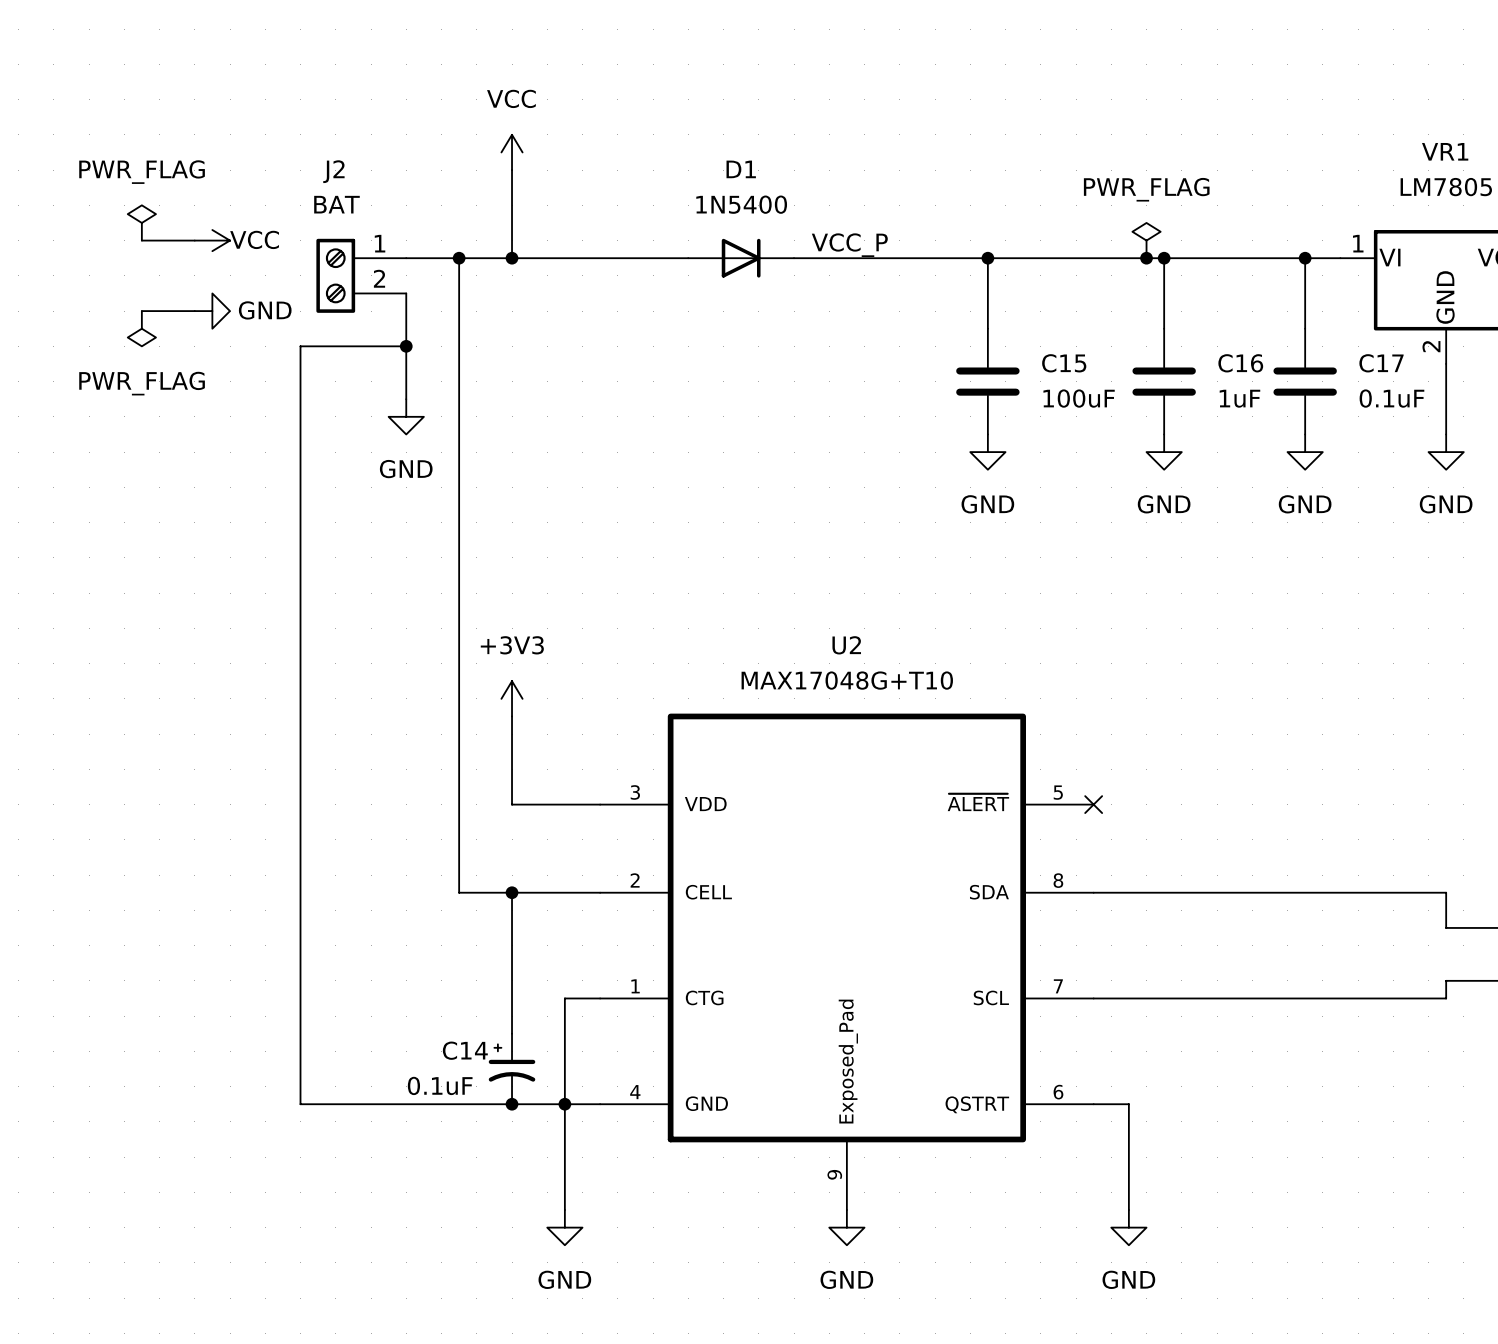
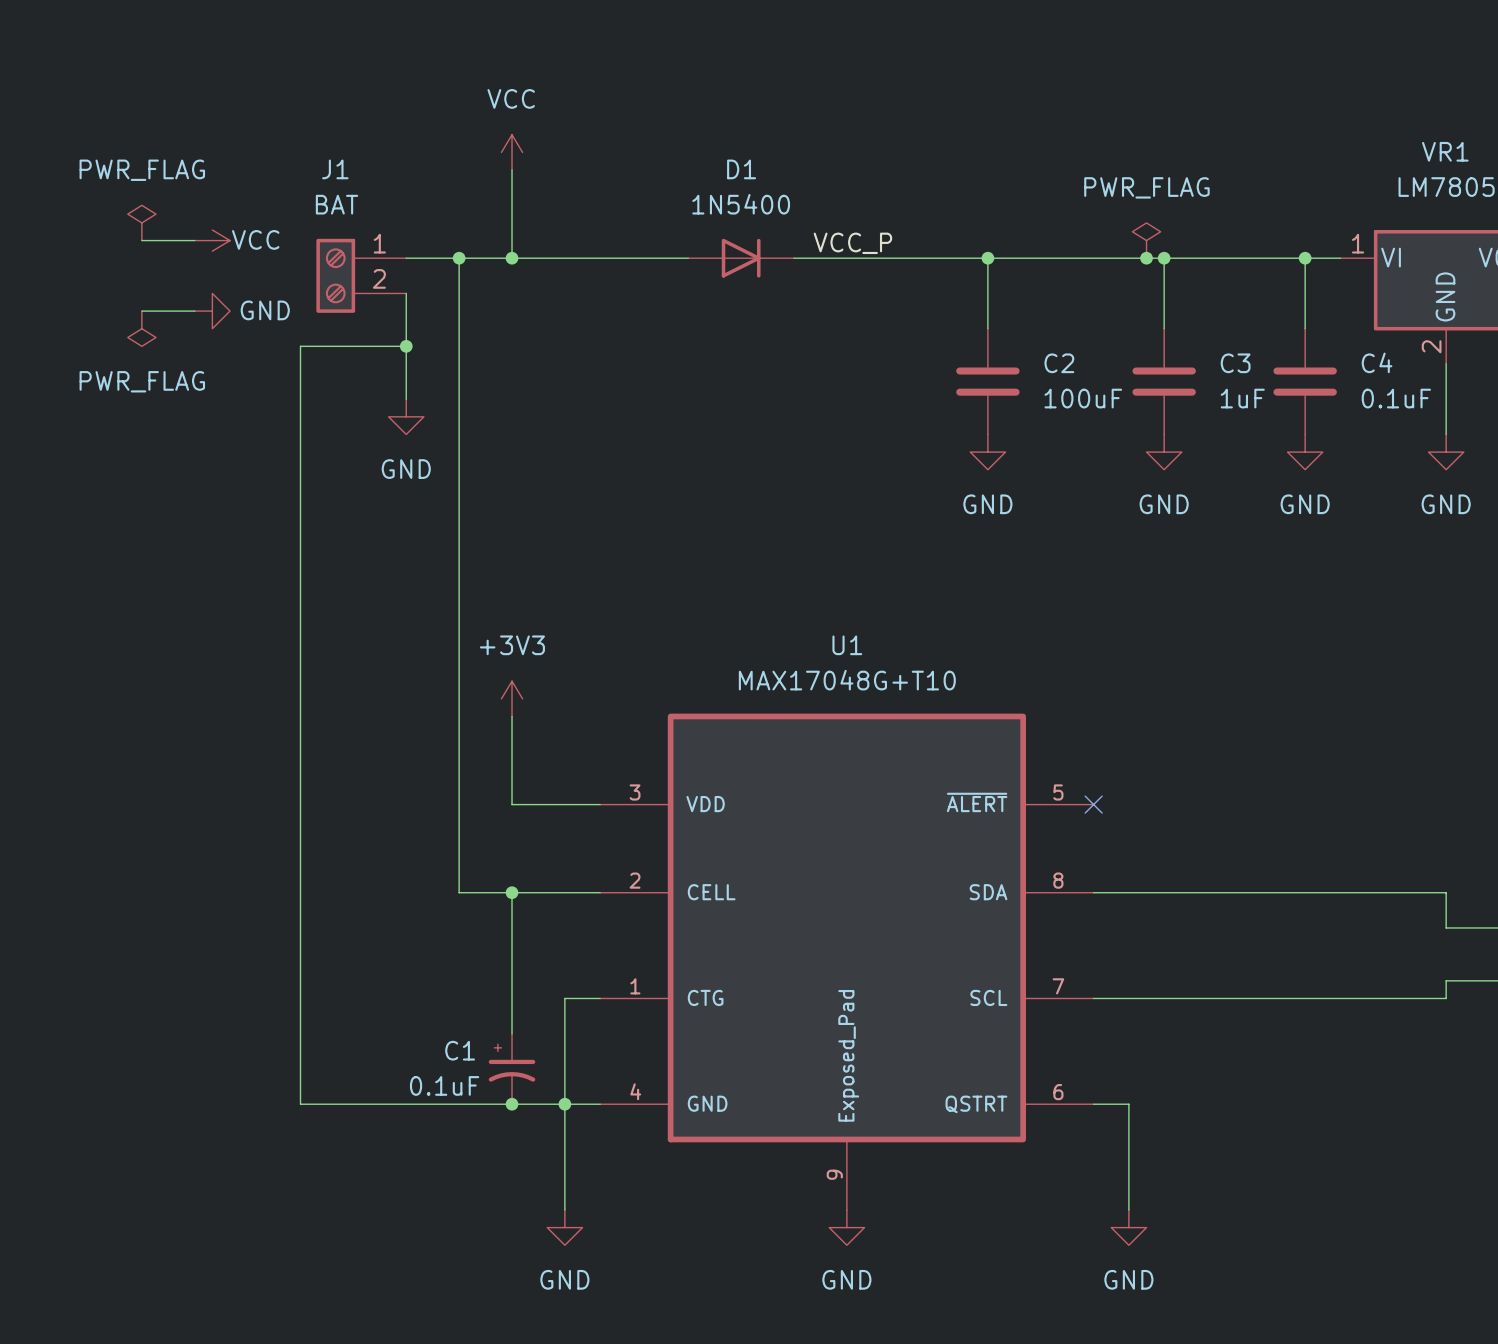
J2 name: J2 (333, 171) -> J1 (335, 169)
C15 name: C15 (1064, 363) -> C2 (1059, 363)
C16 name: C16 (1240, 363) -> C3 (1235, 363)
C17 name: C17 (1381, 363) -> C4 (1377, 362)
U2 name: U2 (846, 645) -> U1 (847, 645)
C14 name: C14 (465, 1050) -> C1 (460, 1050)

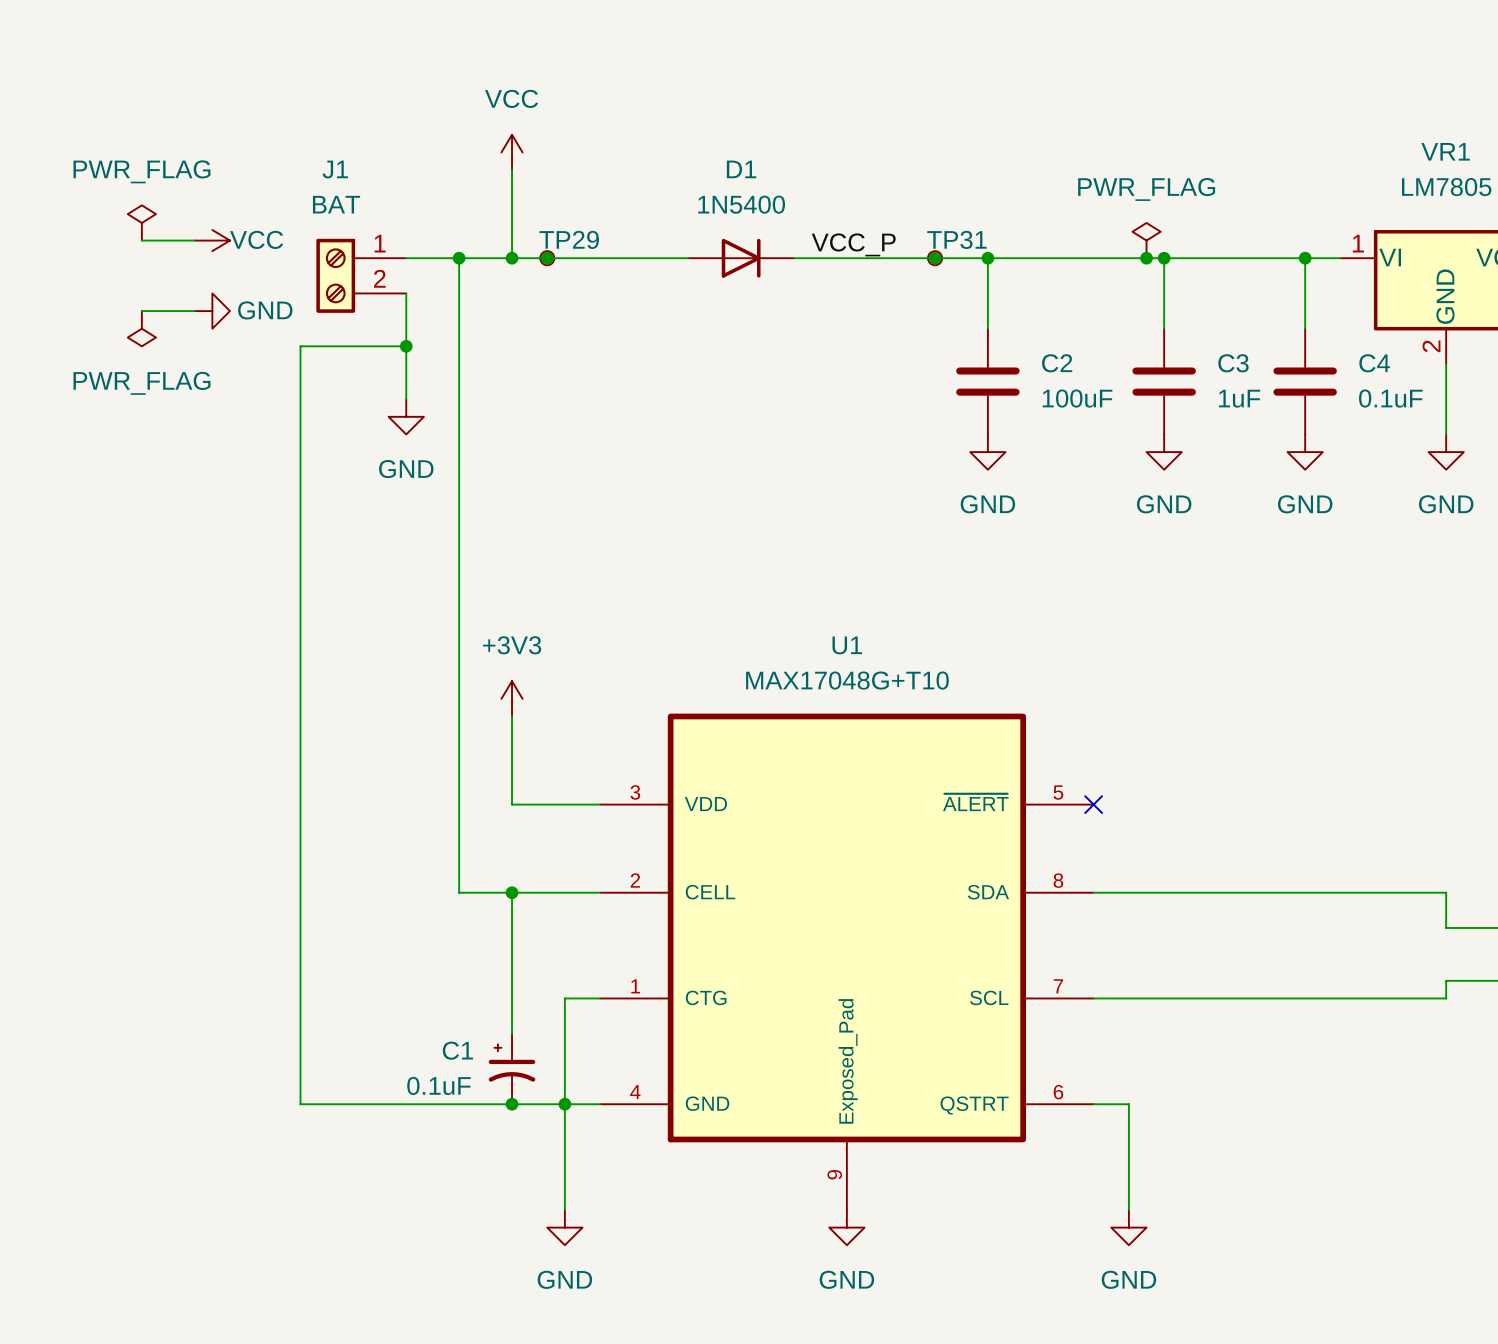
junction: none -> (547, 258)
TP29: none -> (547, 258)
junction: none -> (935, 258)
TP31: none -> (935, 258)

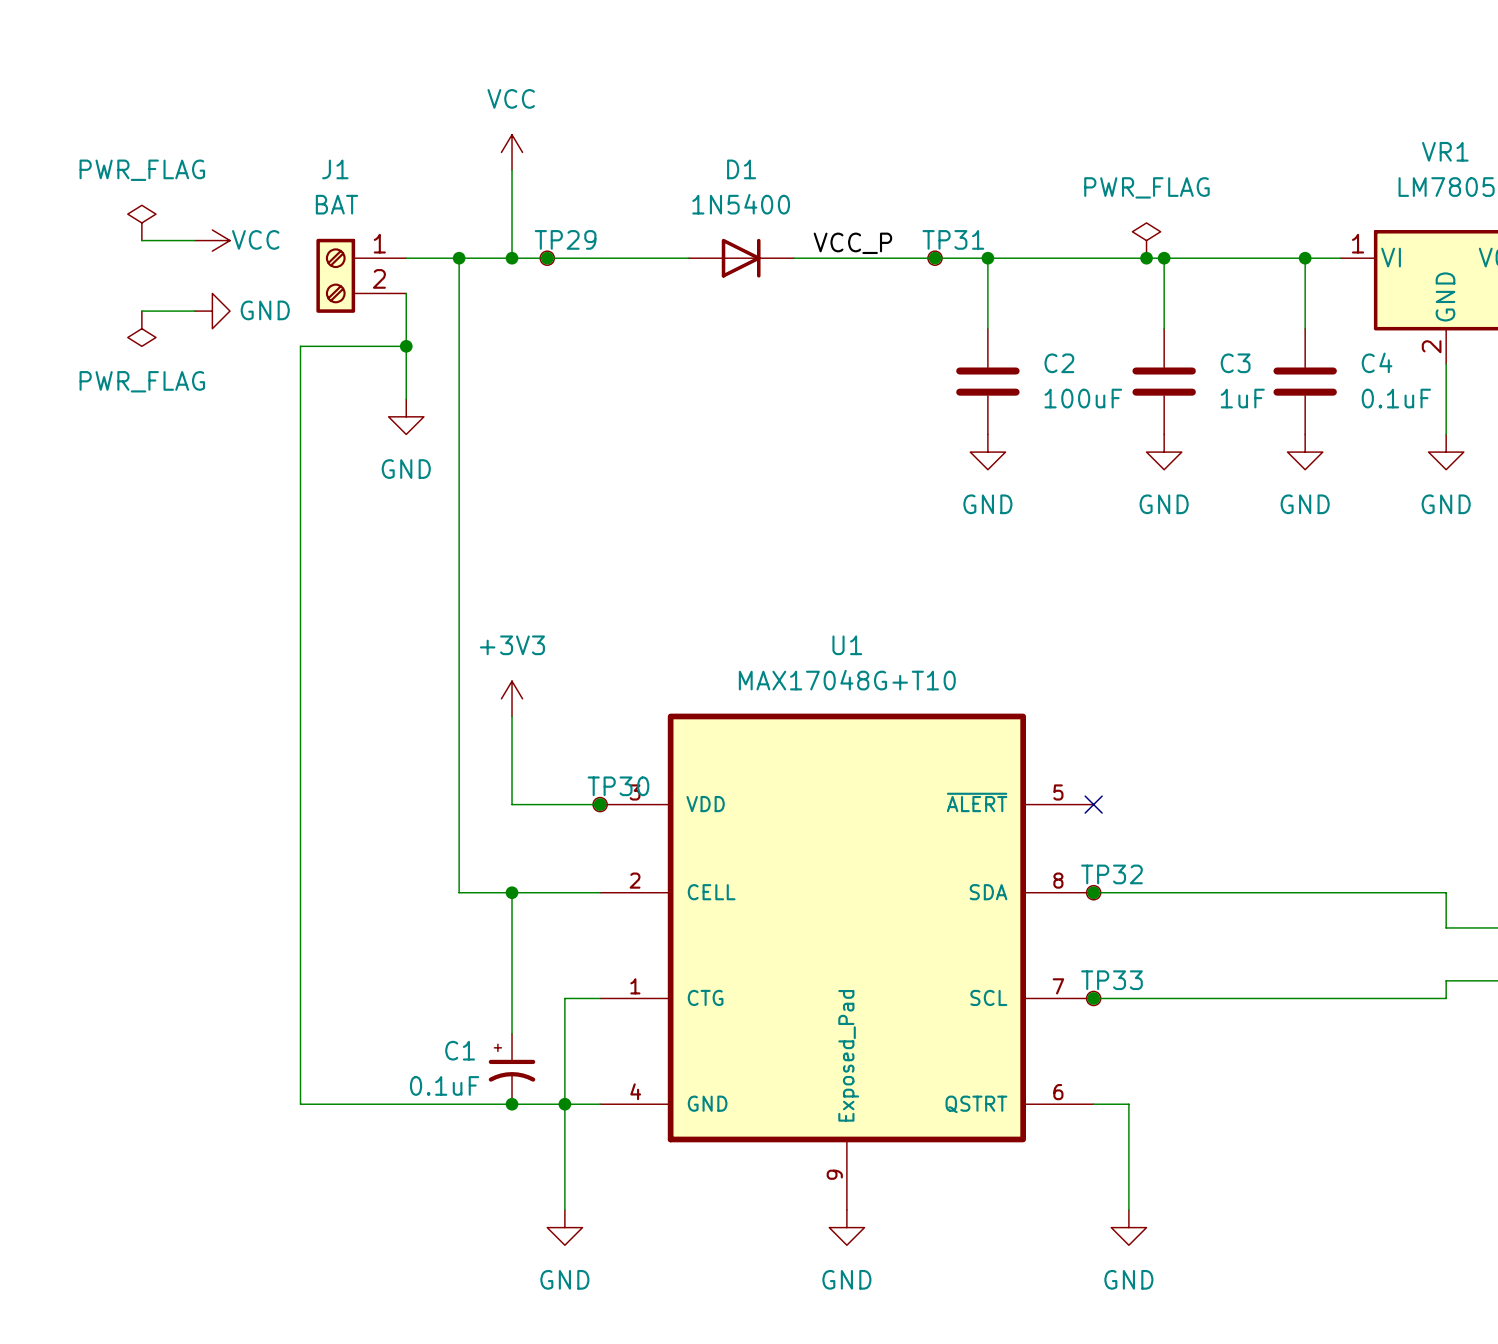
junction: none -> (600, 804)
TP30: none -> (600, 804)
junction: none -> (1093, 892)
TP32: none -> (1093, 892)
junction: none -> (1093, 998)
TP33: none -> (1093, 998)

